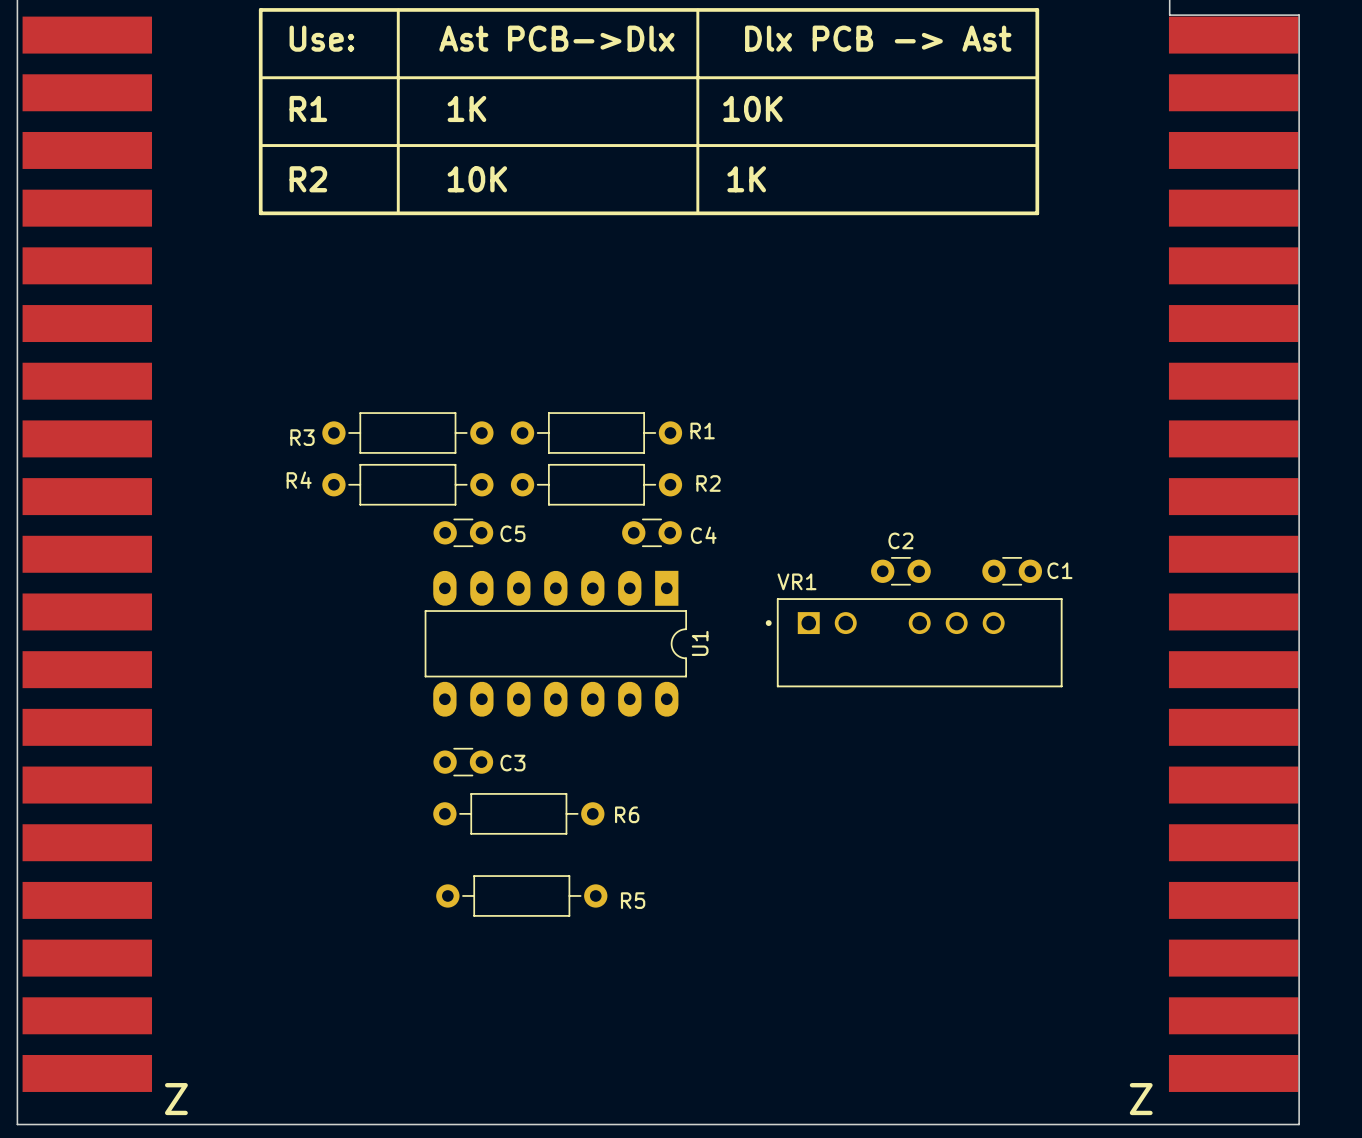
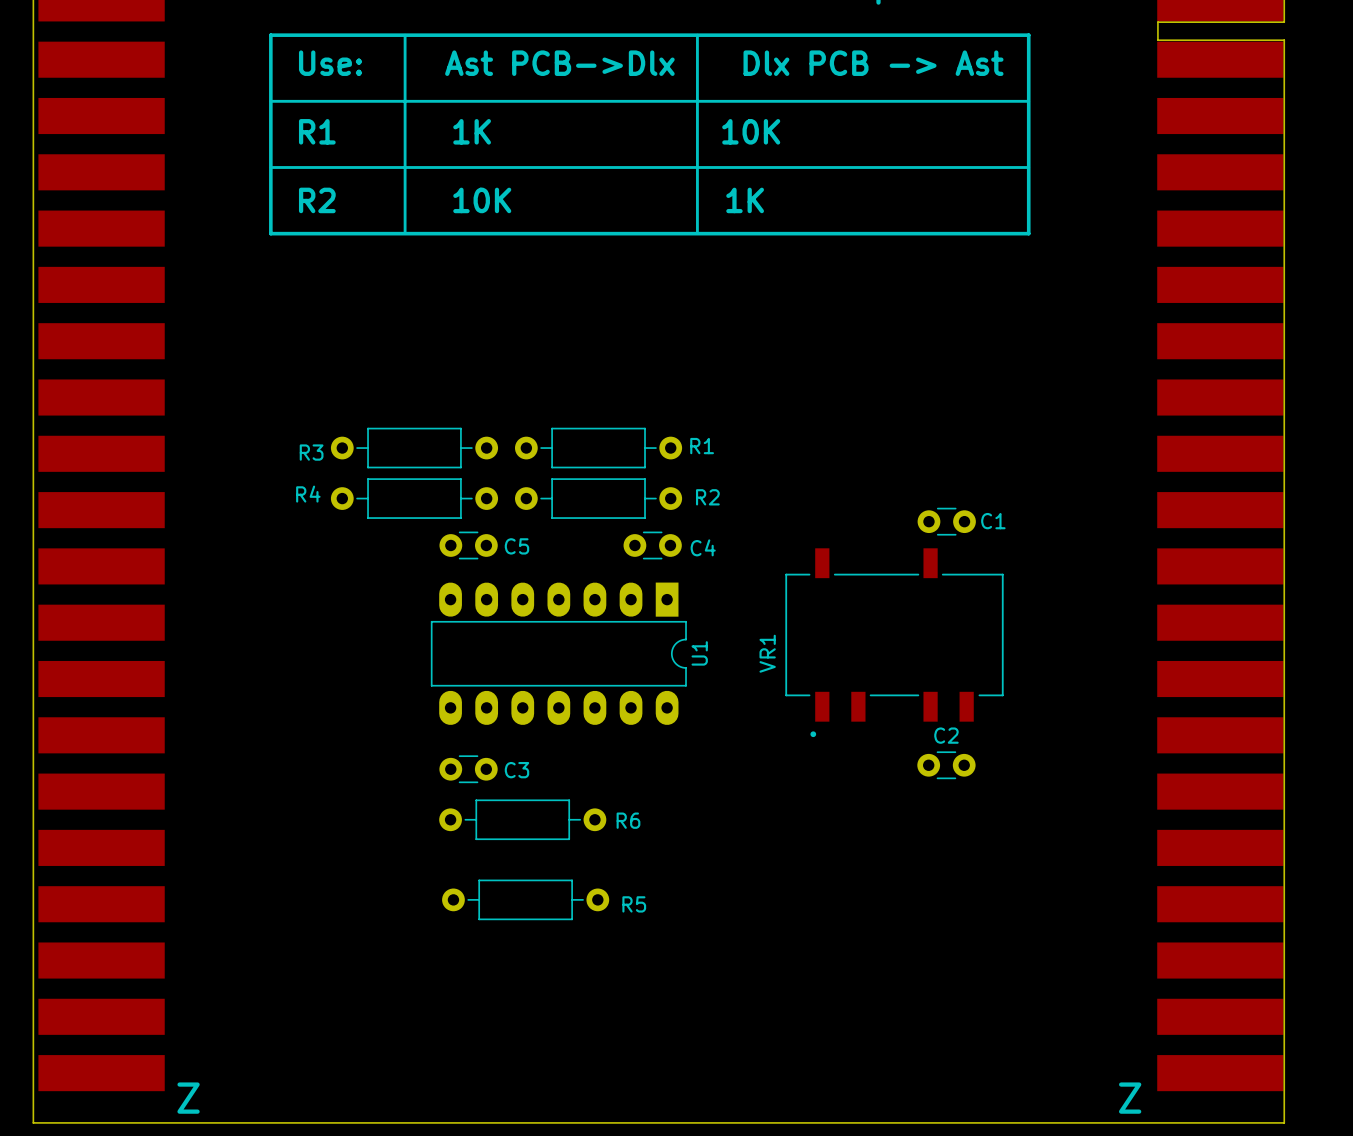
C2 position: (900, 571) -> (946, 765)
C1 position: (1012, 571) -> (946, 521)
VR1 name position: VR1 (796, 581) -> VR1 (767, 653)
VR1 footprint: [765, 598, 1063, 688] -> [785, 548, 1004, 738]

